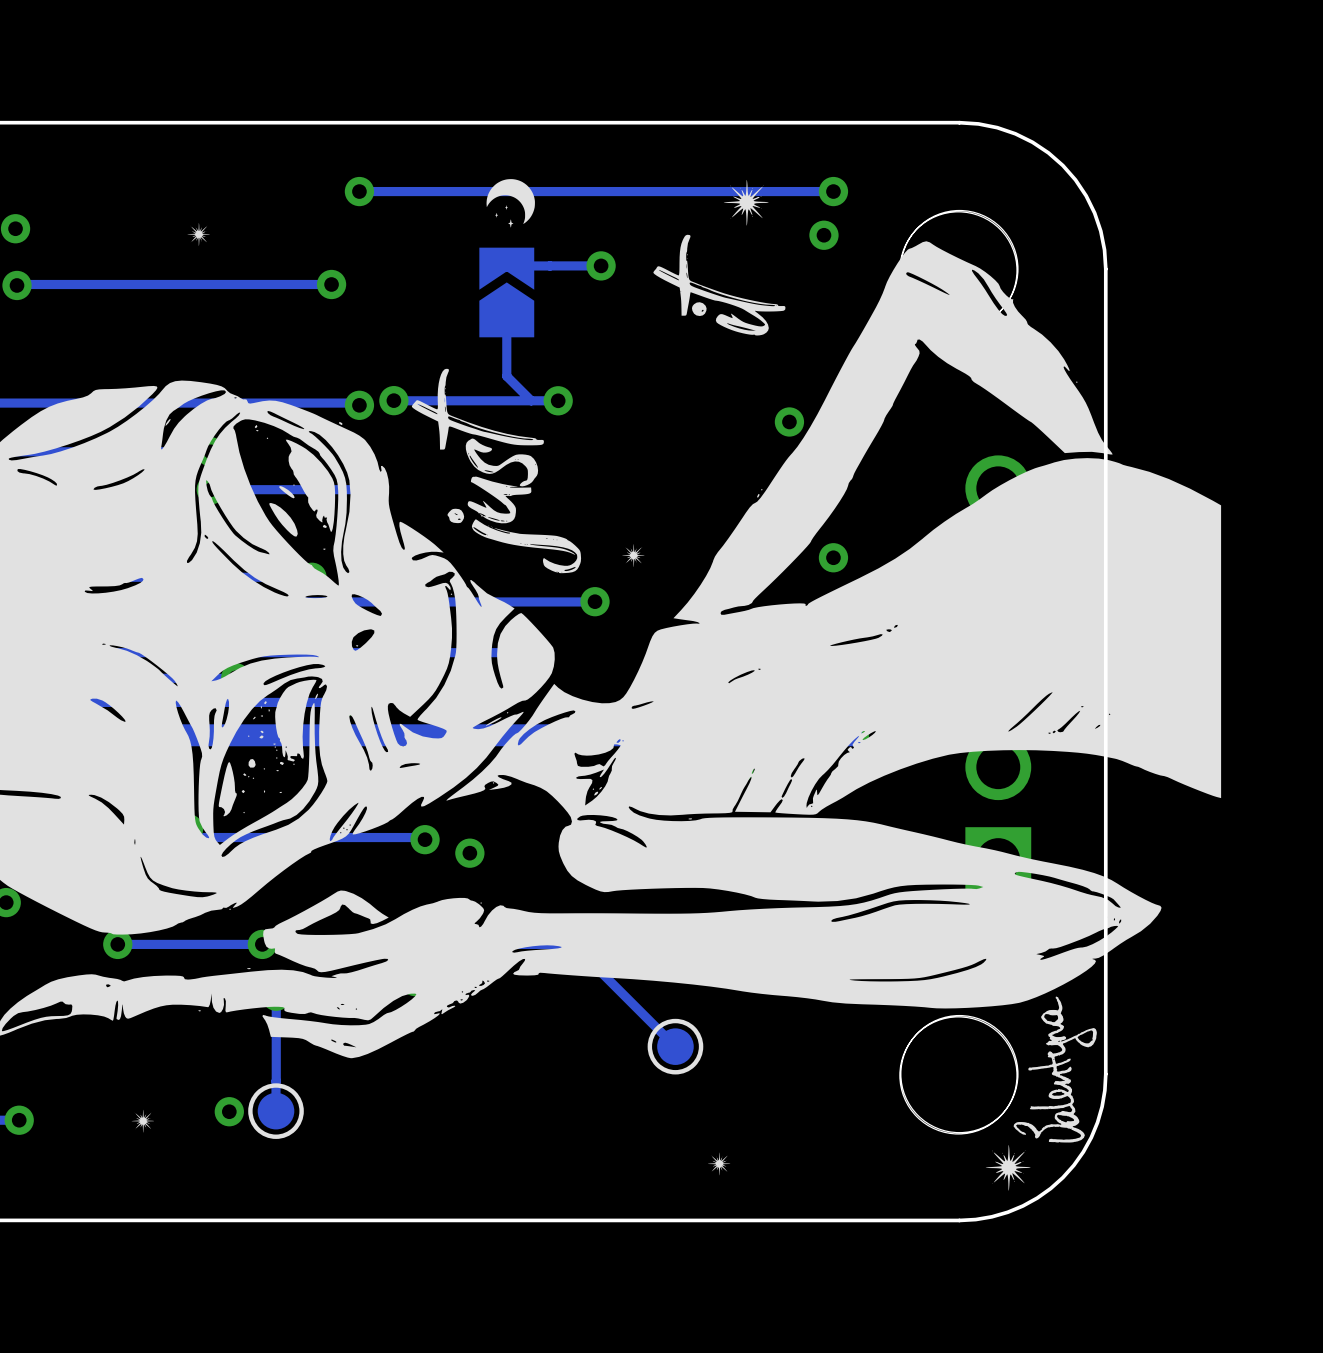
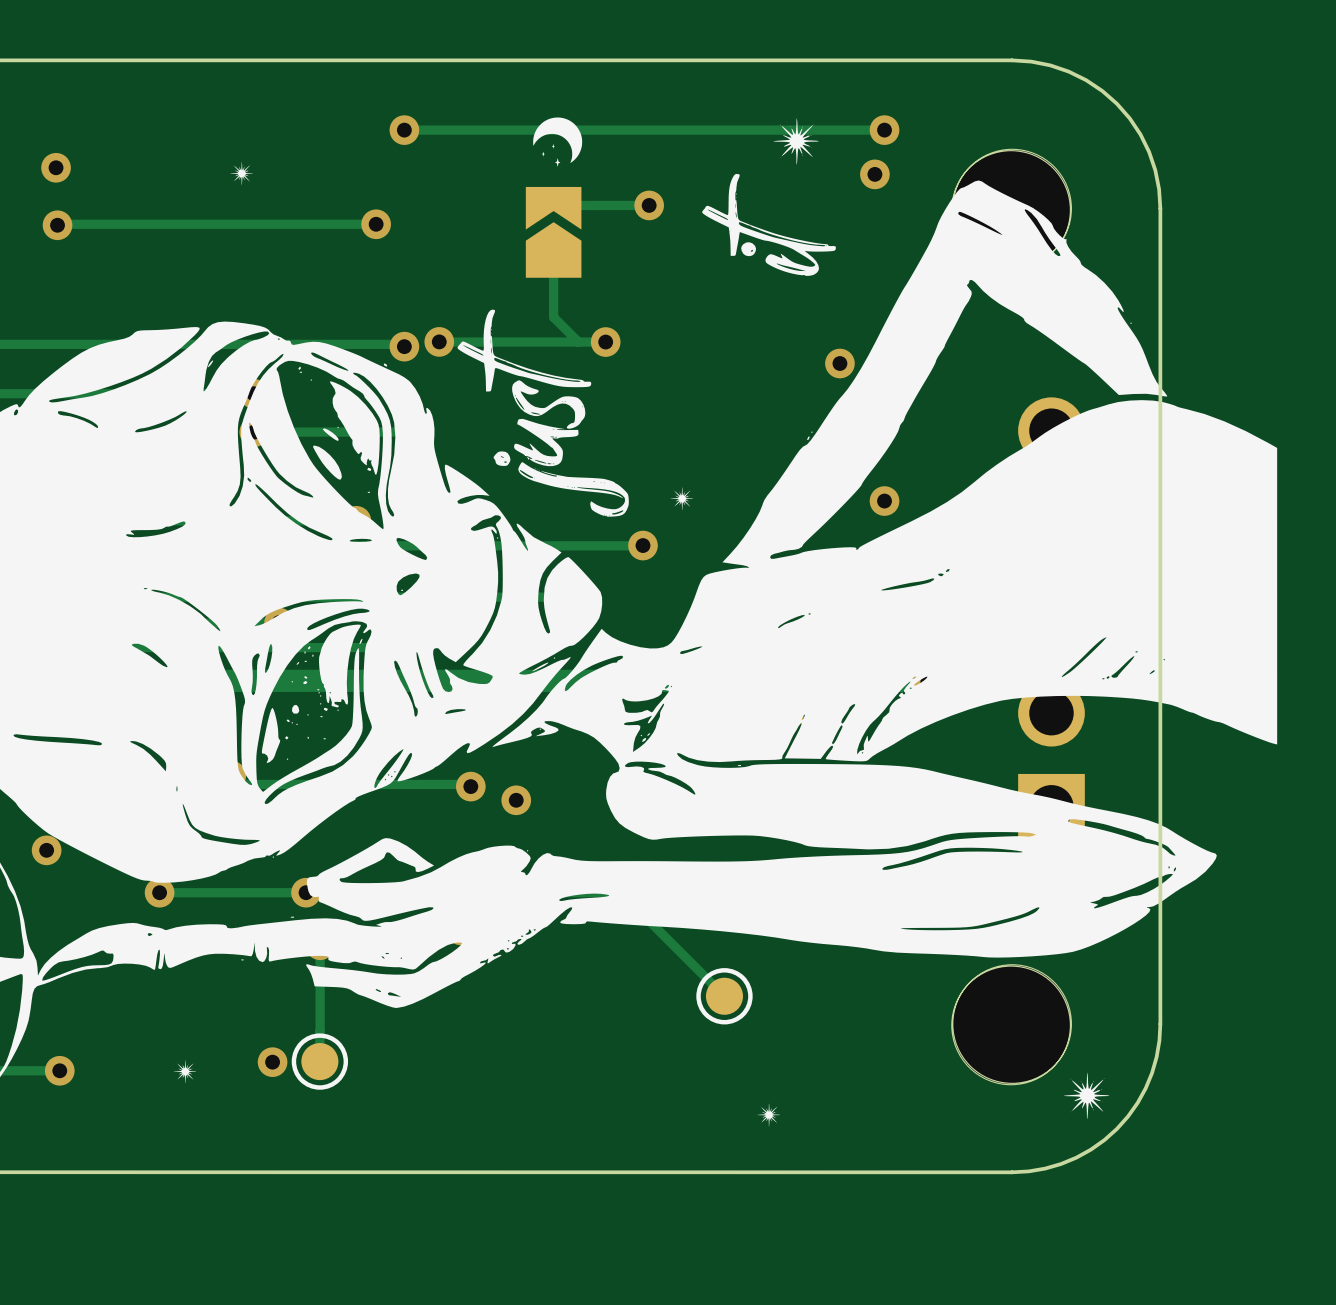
drawing: [1013, 996, 1097, 1143] -> none
drawing position: (1008, 1167) -> (1086, 1095)

